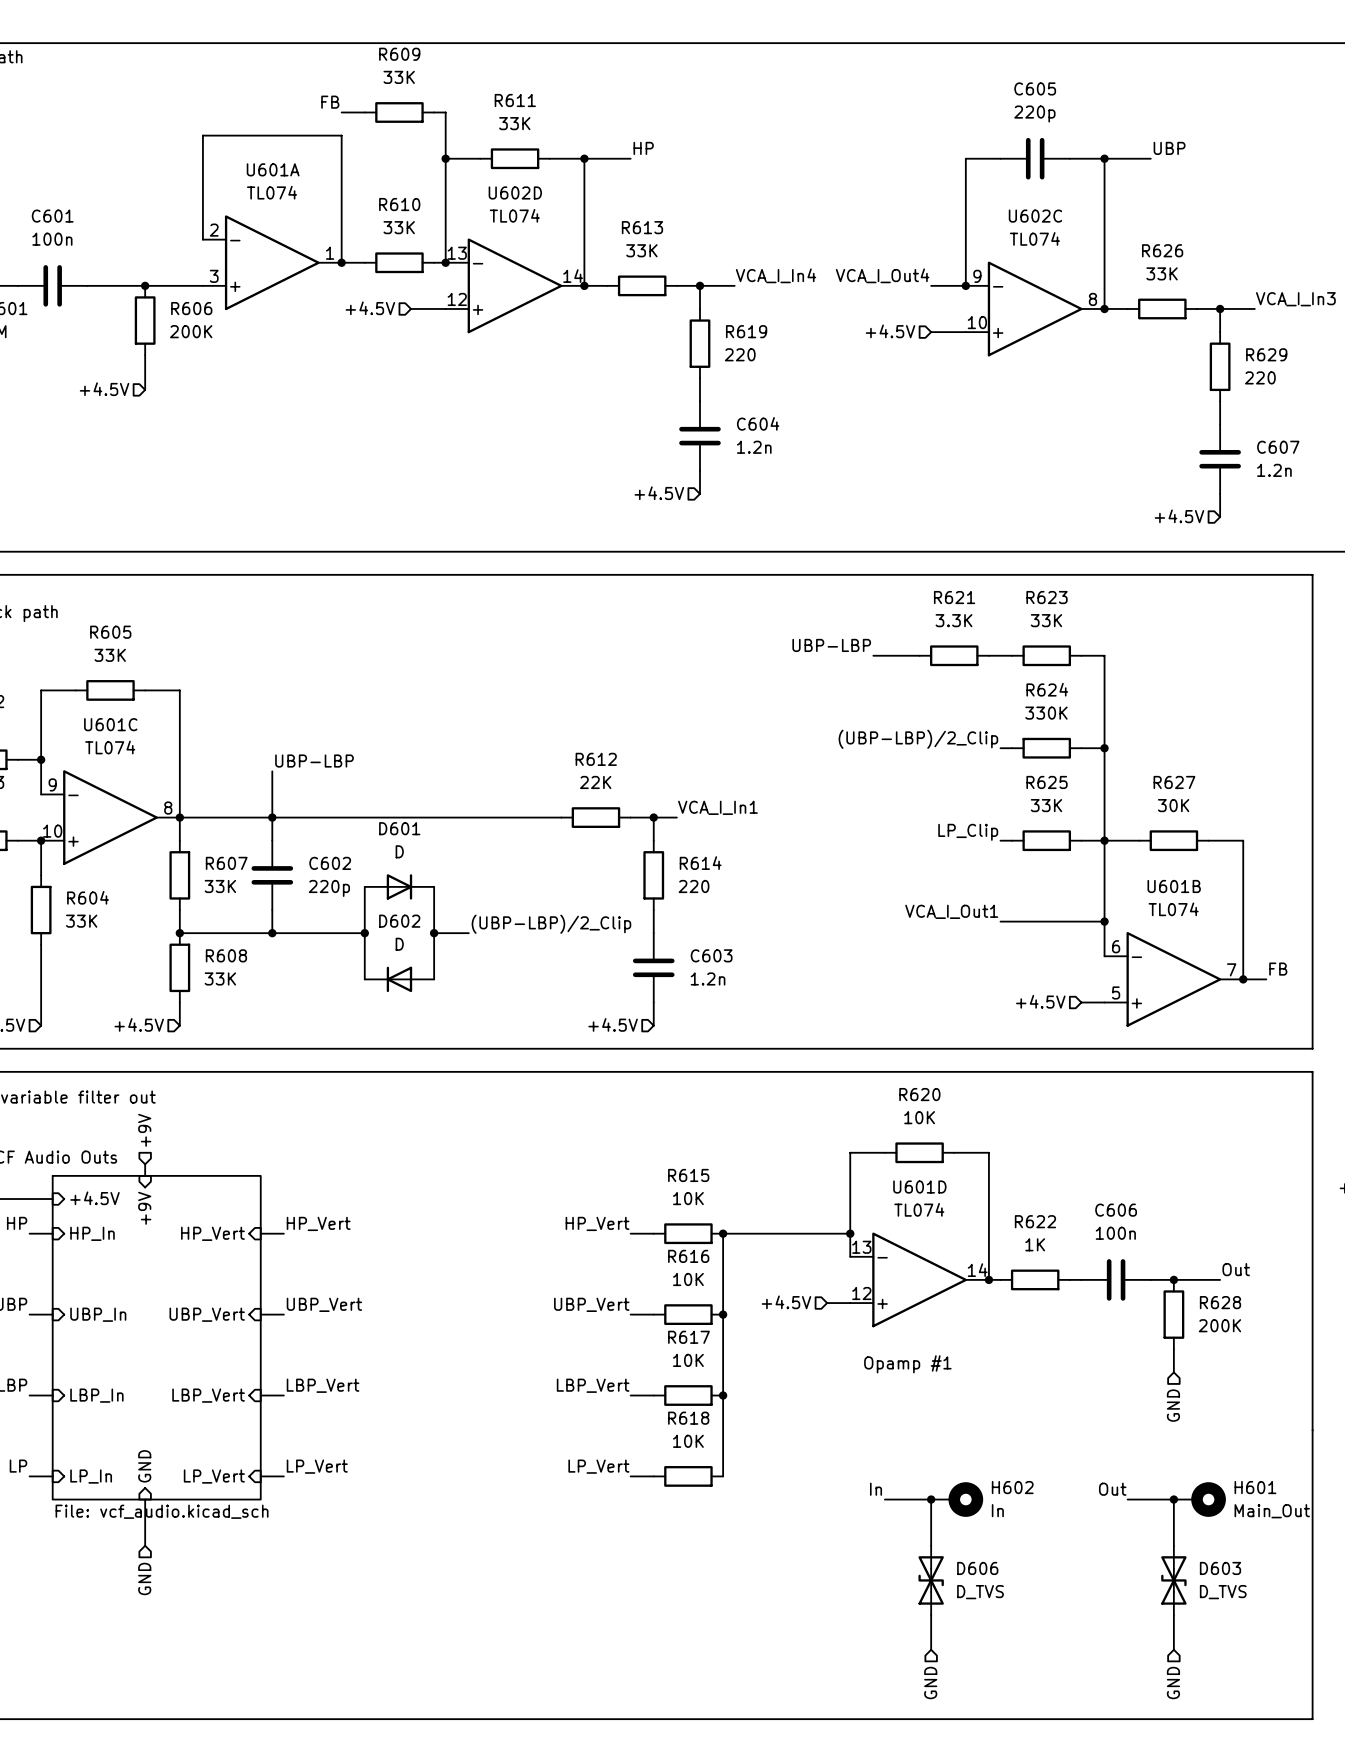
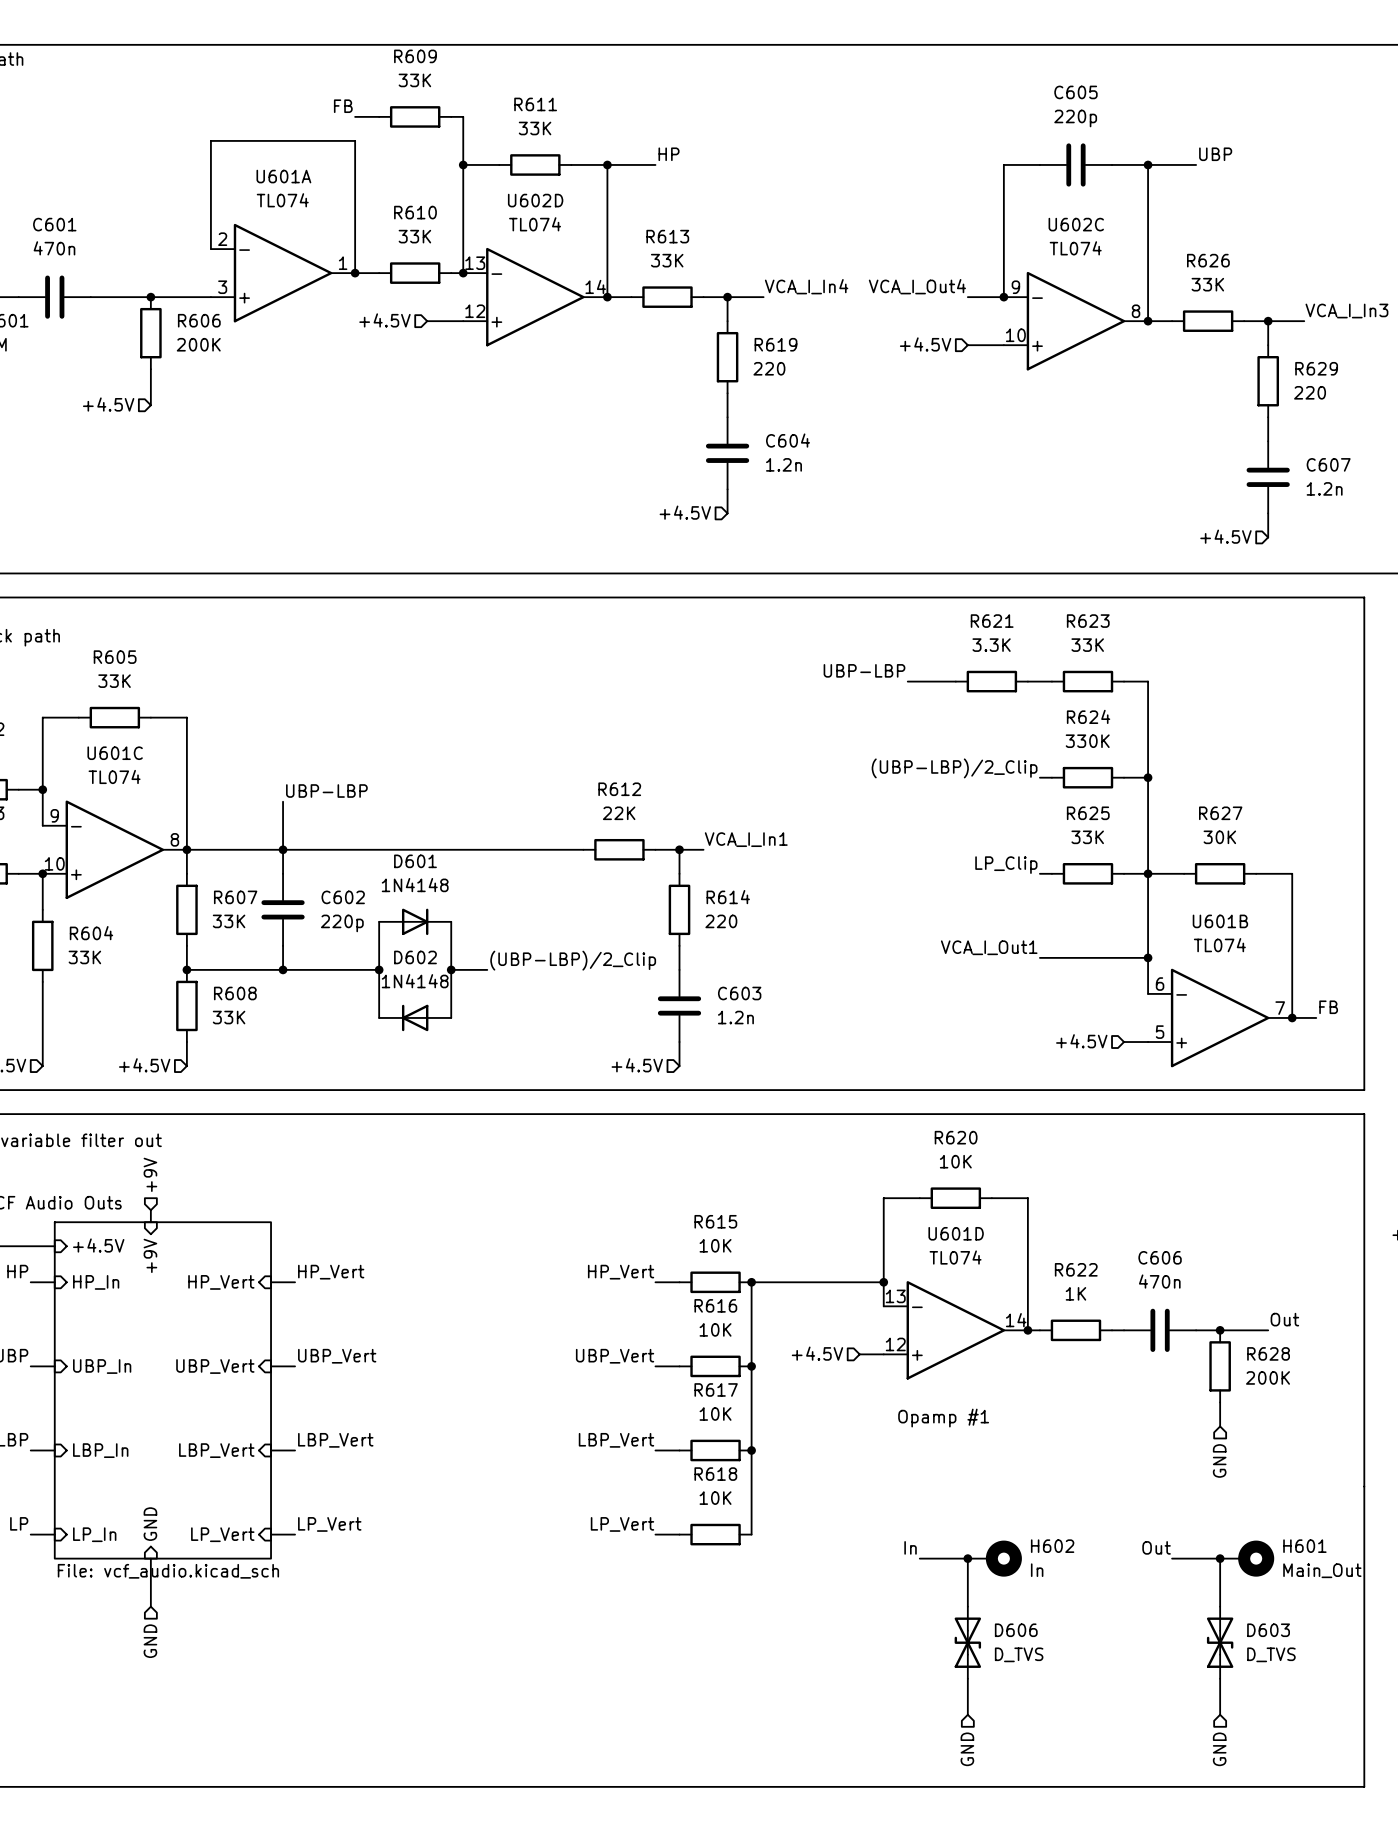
C601 value: 100n (52, 239) -> 470n (54, 248)
D601 value: D (399, 851) -> 1N4148 (415, 885)
D602 value: D (399, 944) -> 1N4148 (415, 981)
C606 value: 100n (1115, 1233) -> 470n (1159, 1281)

